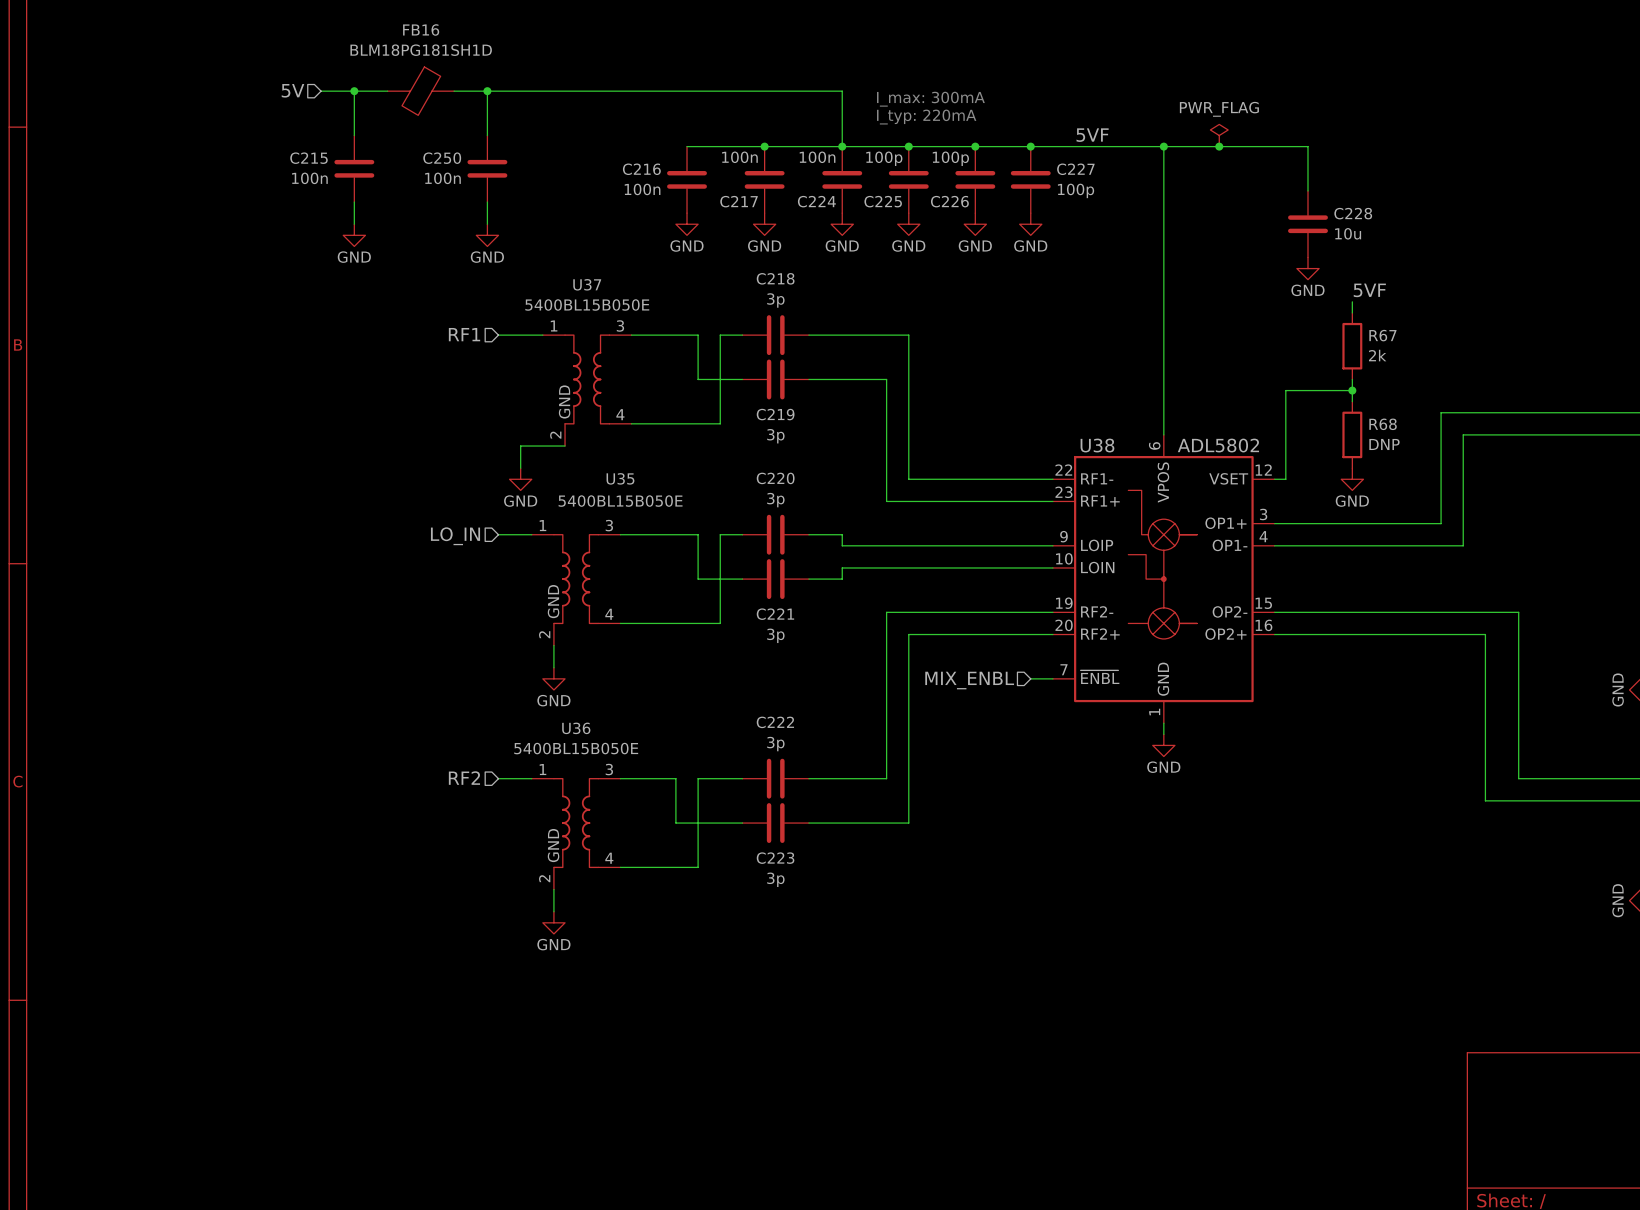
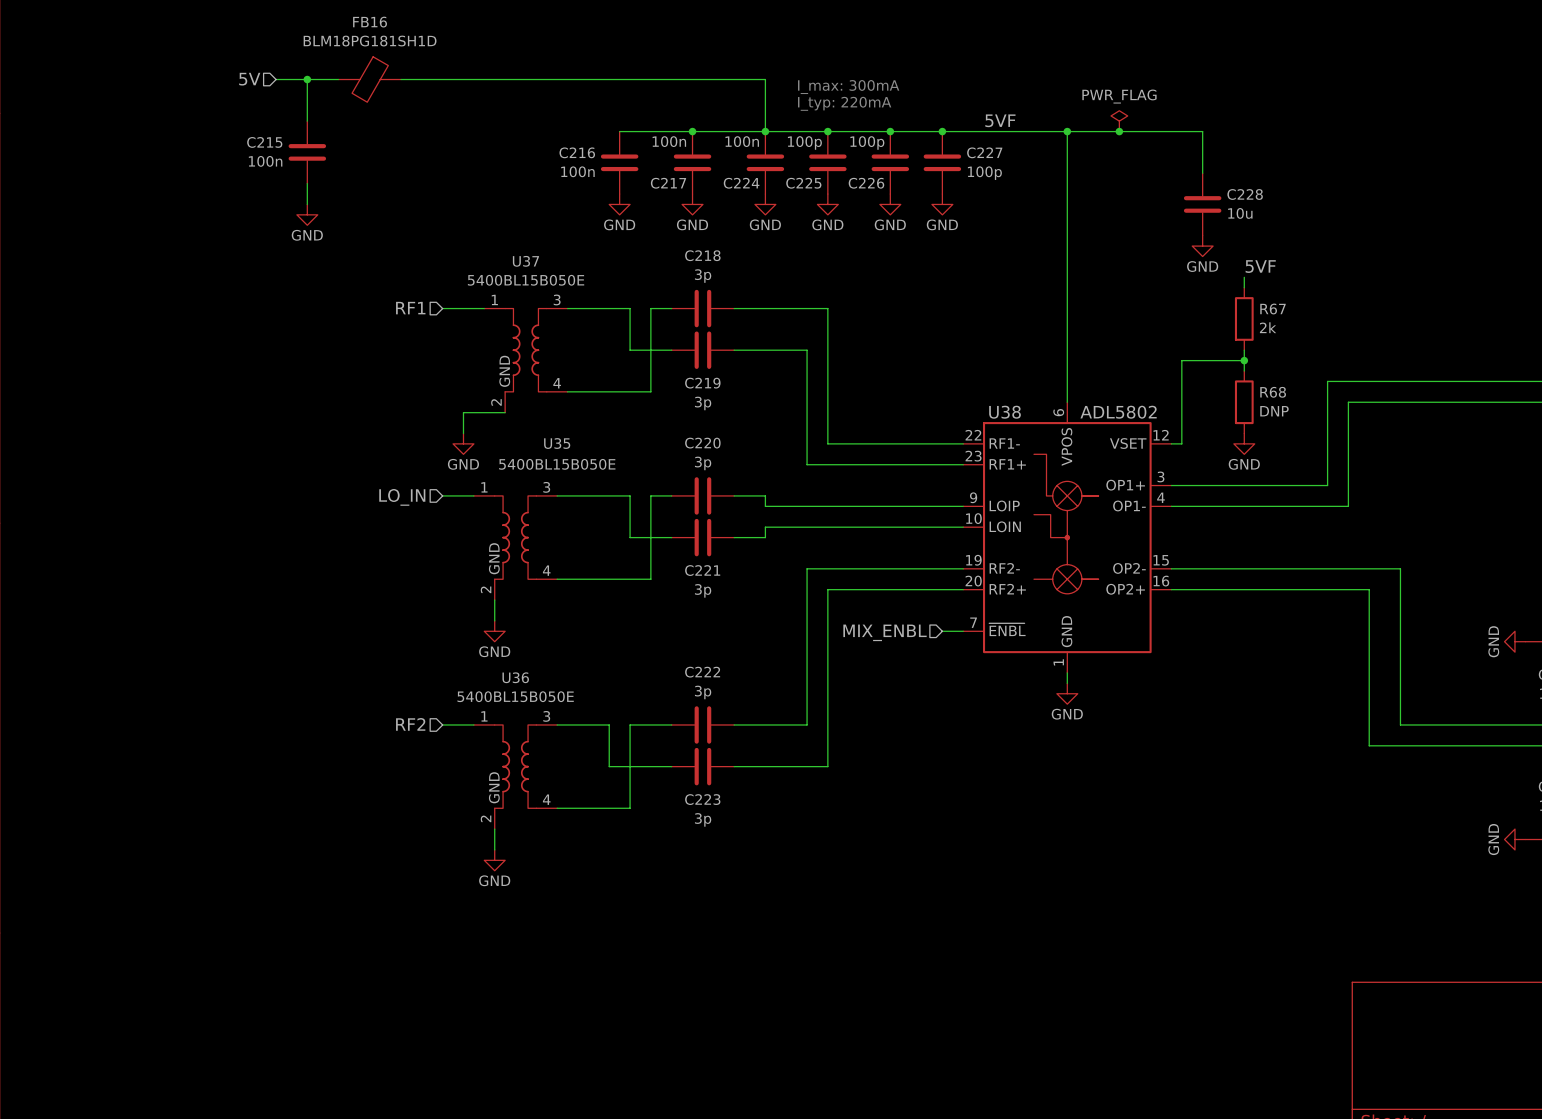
wire: (487, 91) (487, 135) -> none
junction: (487, 91) -> none
C250: 100n (487, 168) -> none
wire: (487, 202) (487, 224) -> none
power symbol: GND (487, 235) -> none

